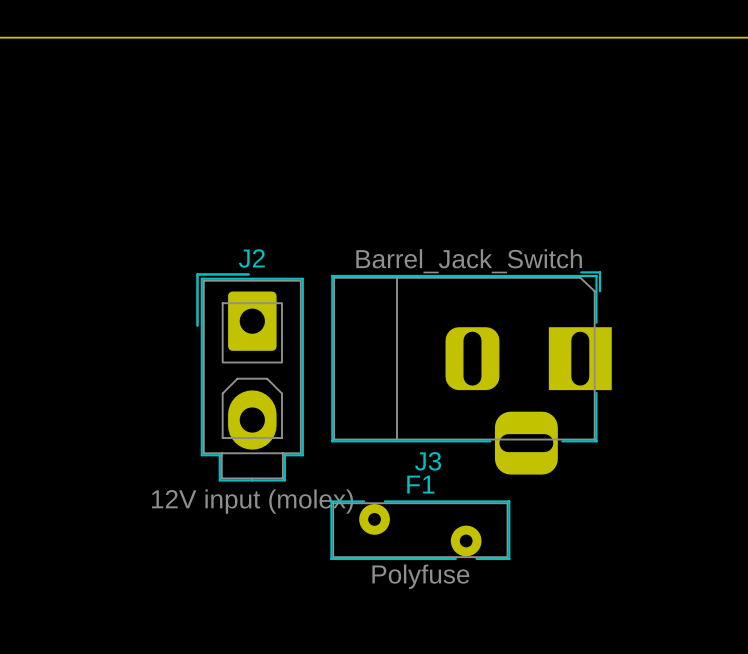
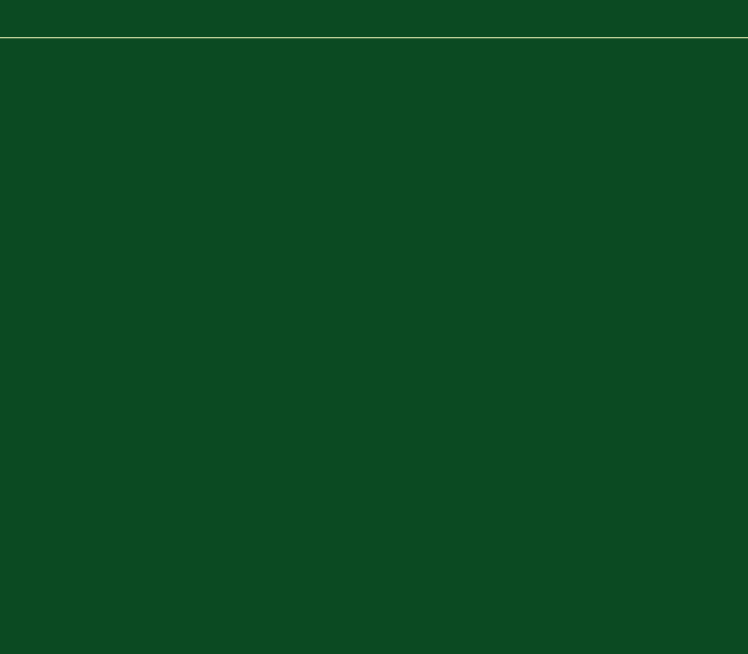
J3: Barrel_Jack_Switch (471, 372) -> none
J2: 12V input (molex) (250, 377) -> none
F1: Polyfuse (420, 530) -> none

